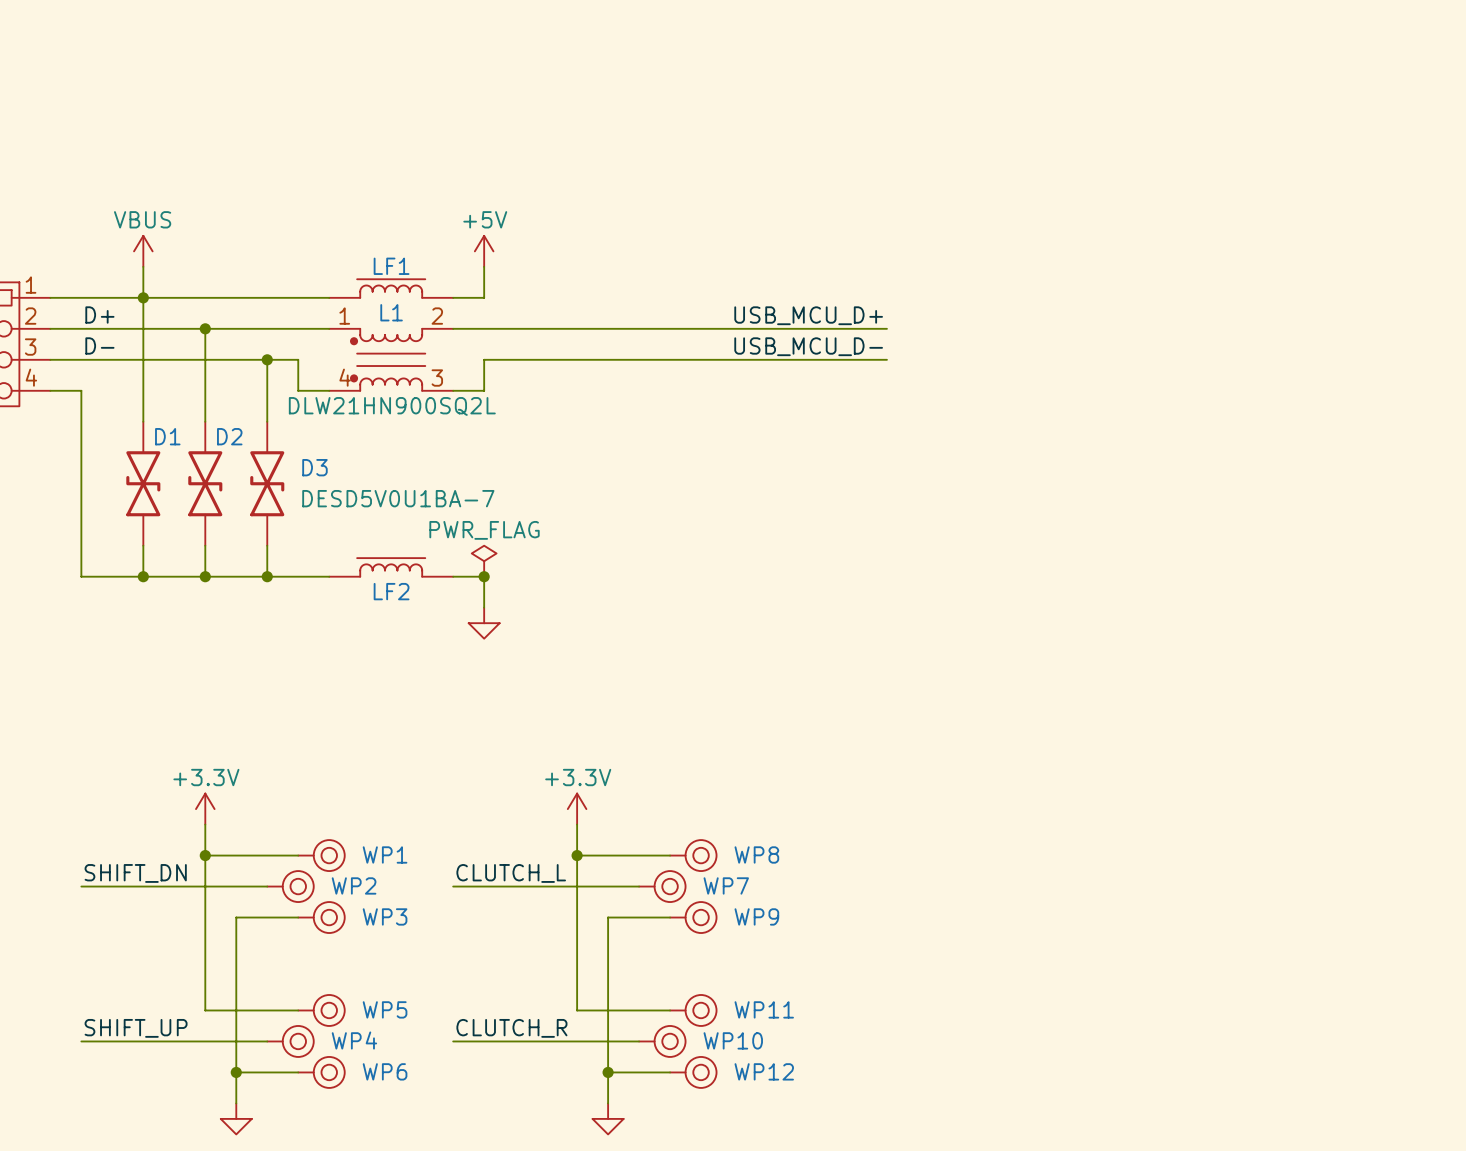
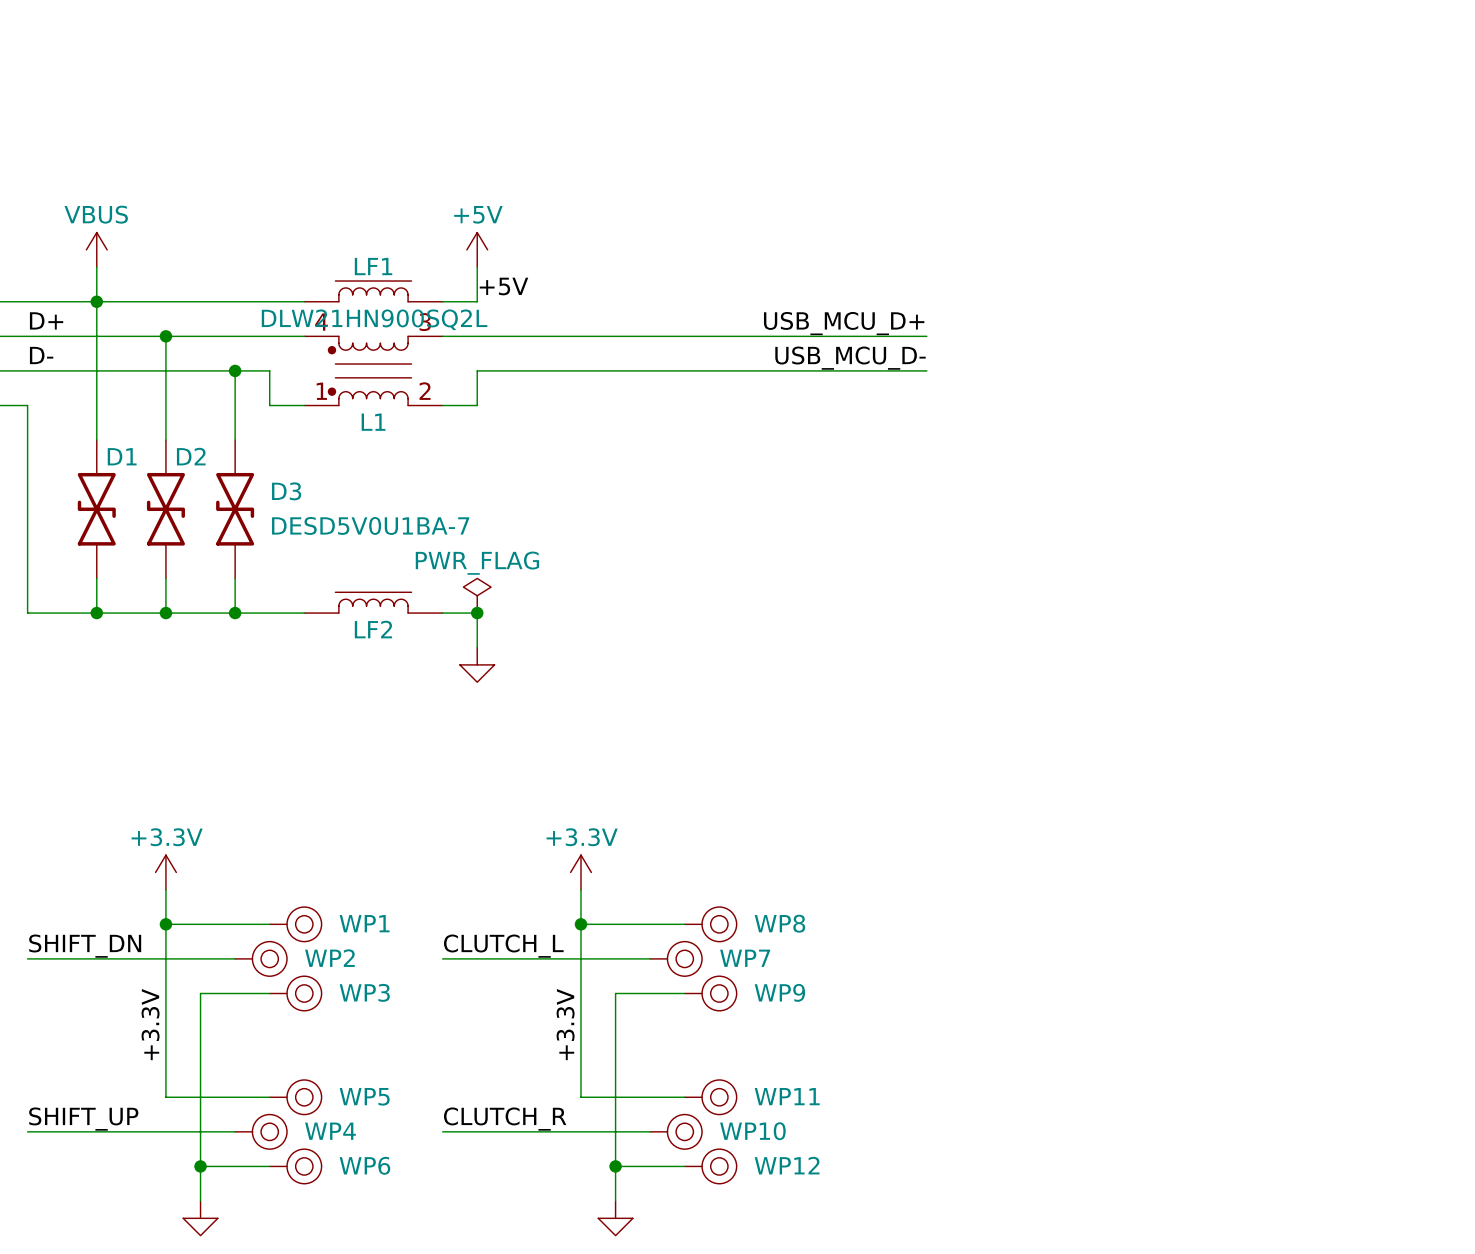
label: none -> +5V (503, 286)
L1 flip: as is (388, 359) -> up-down (370, 370)
label: none -> +3.3V (150, 1024)
label: none -> +3.3V (565, 1024)

